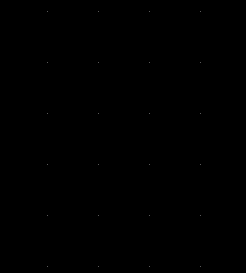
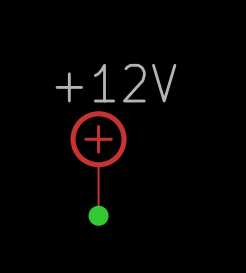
power symbol: none -> +12V (98, 163)
junction: none -> (98, 215)

